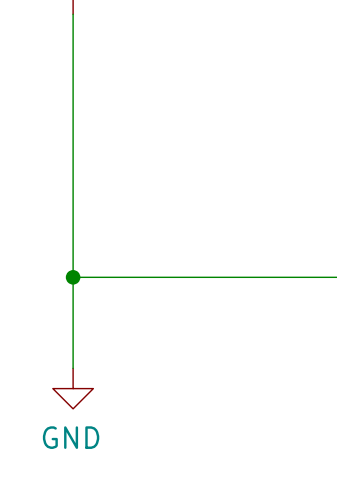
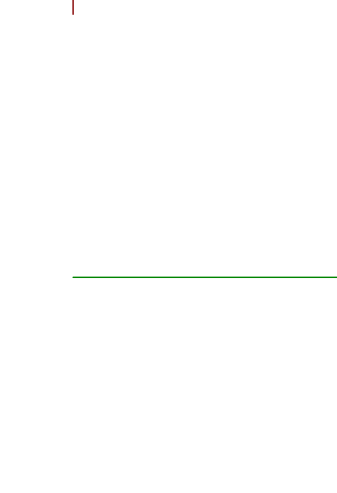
wire: (73, 14) (73, 368) -> none
junction: (73, 277) -> none
power symbol: GND (73, 388) -> none

